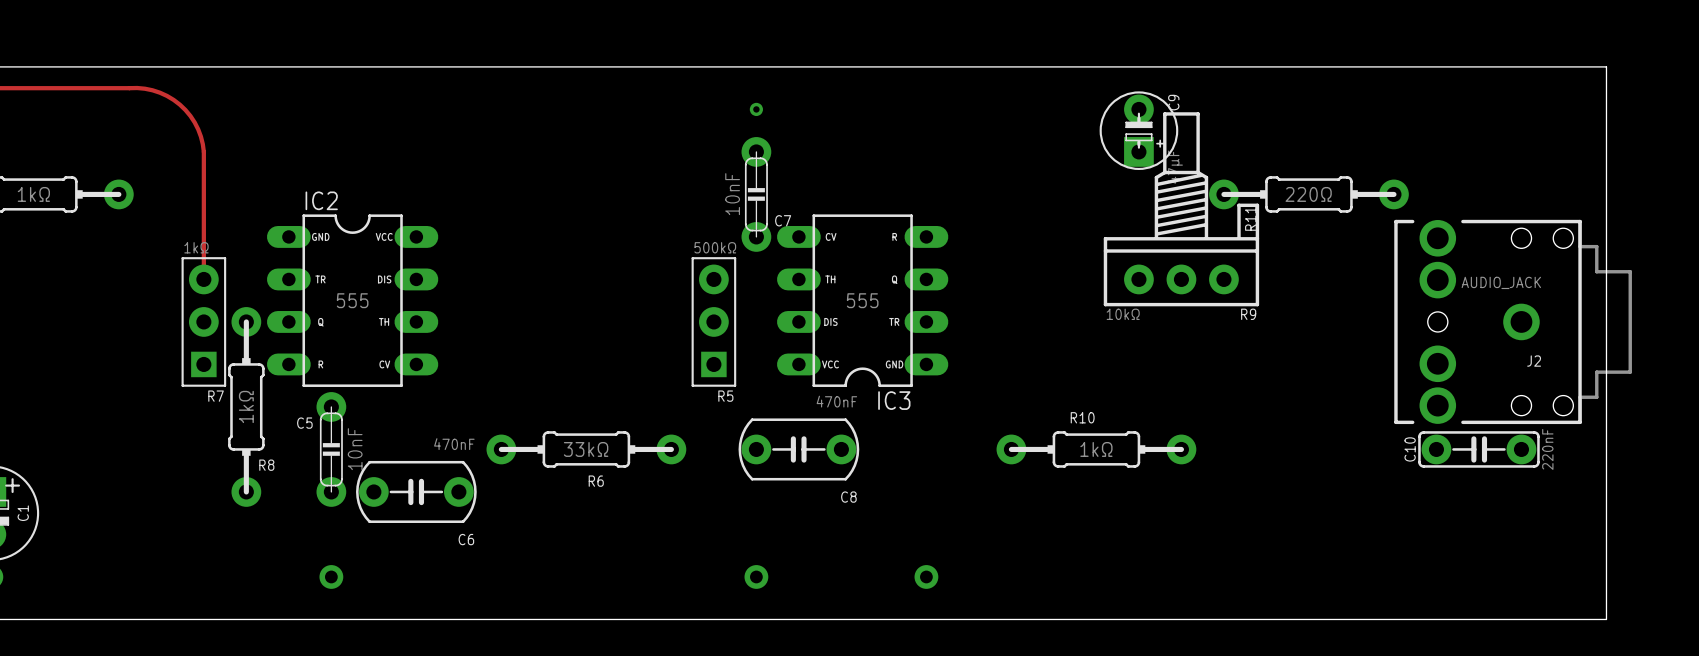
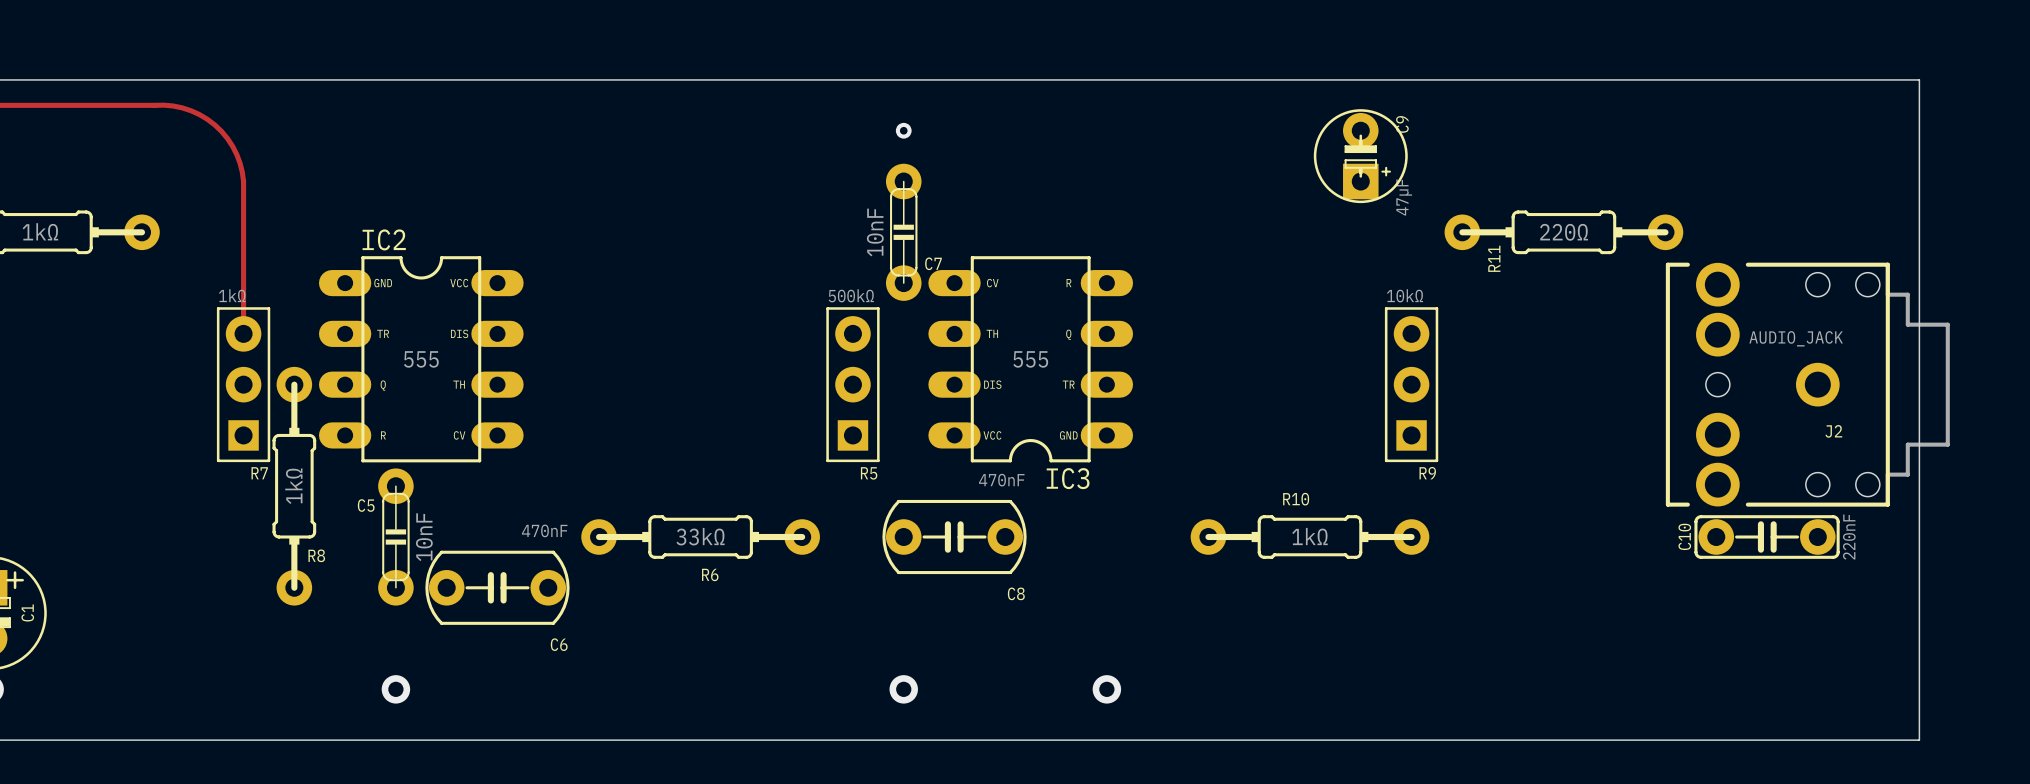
R9 footprint: [1103, 112, 1260, 307] -> [1384, 307, 1439, 463]
R9 value position: 10kΩ (1123, 314) -> 10kΩ (1405, 295)
R9 name position: R9 (1248, 314) -> R9 (1427, 473)

